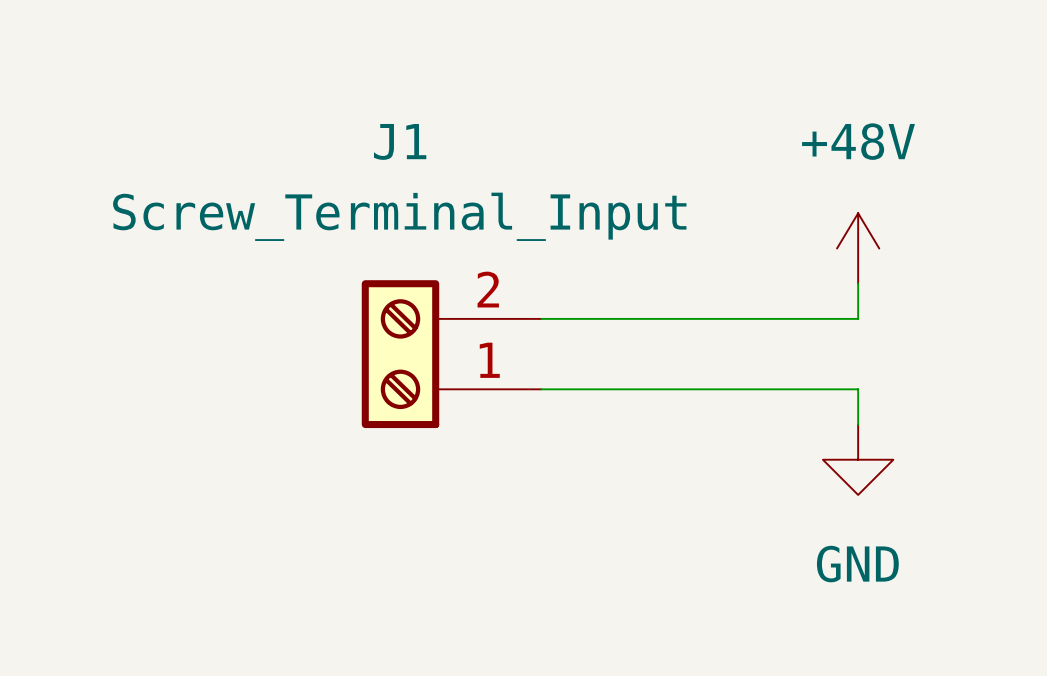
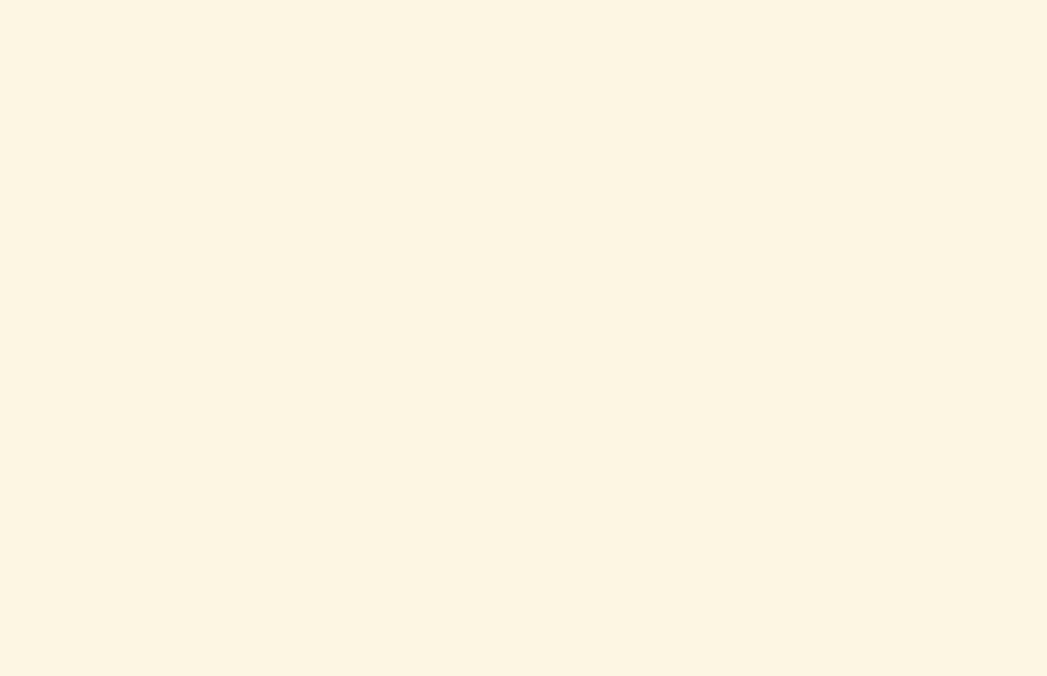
power symbol: +48V (858, 248) -> none
wire: (858, 283) (858, 318) (541, 318) -> none
J1: Screw_Terminal_Input (451, 354) -> none
wire: (541, 389) (858, 389) (858, 424) -> none
power symbol: GND (858, 459) -> none

